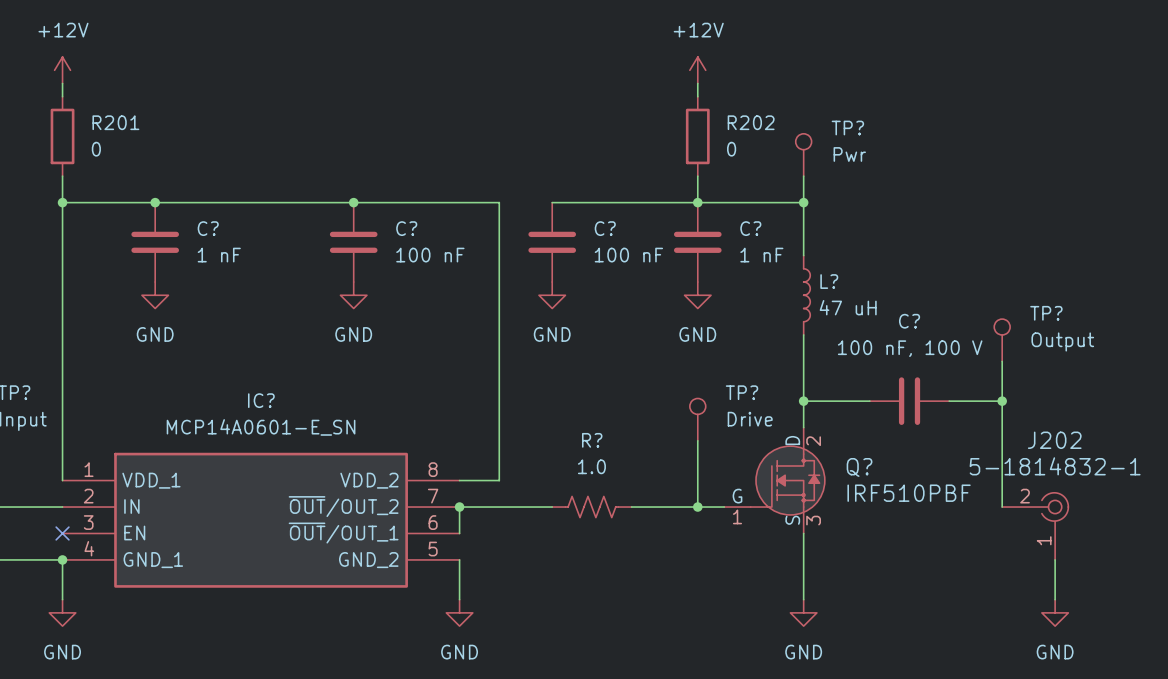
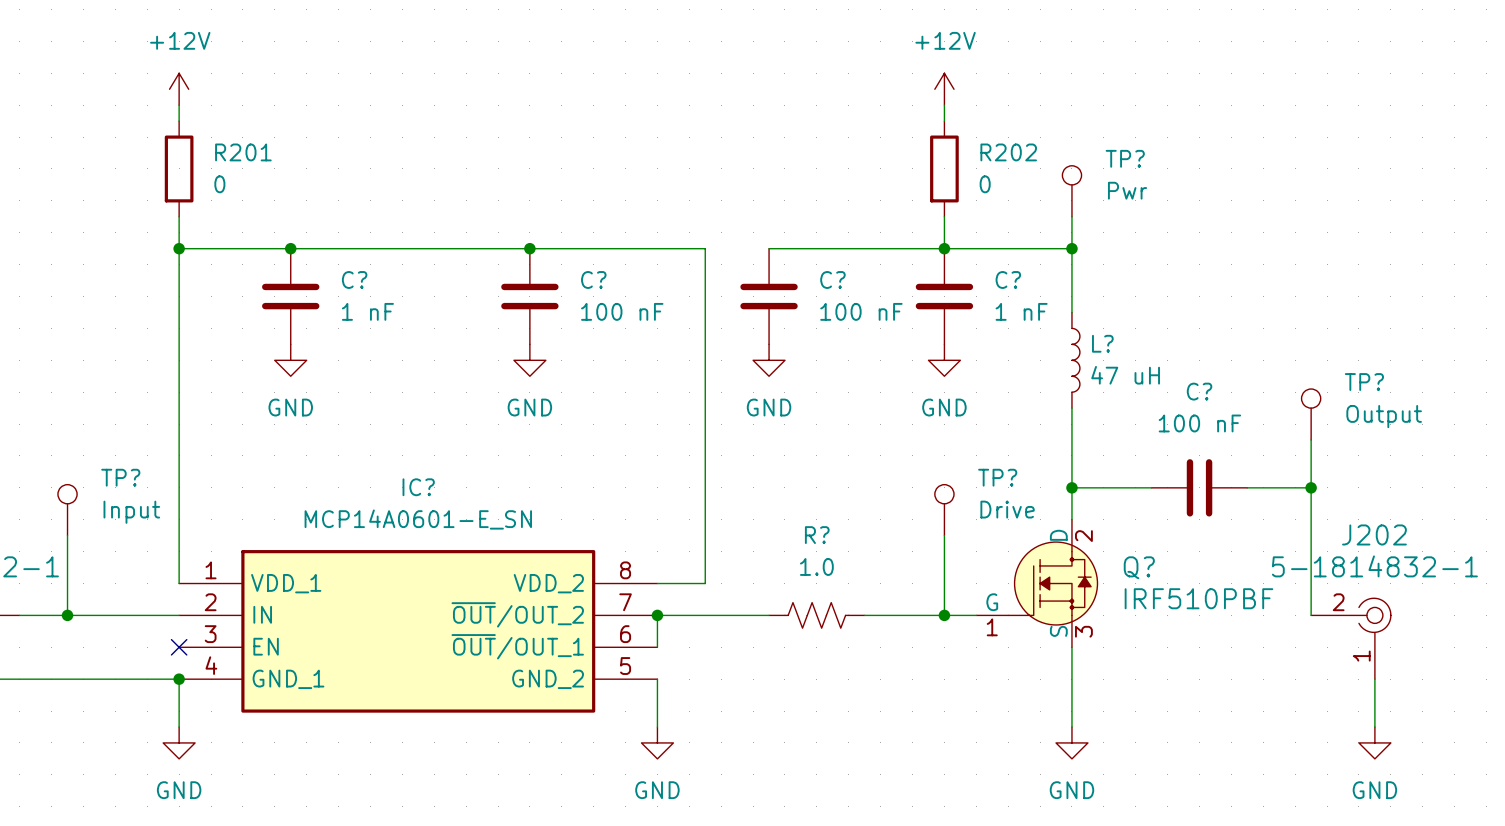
C? value: 100 nF, 100 V (910, 348) -> 100 nF (1199, 423)

